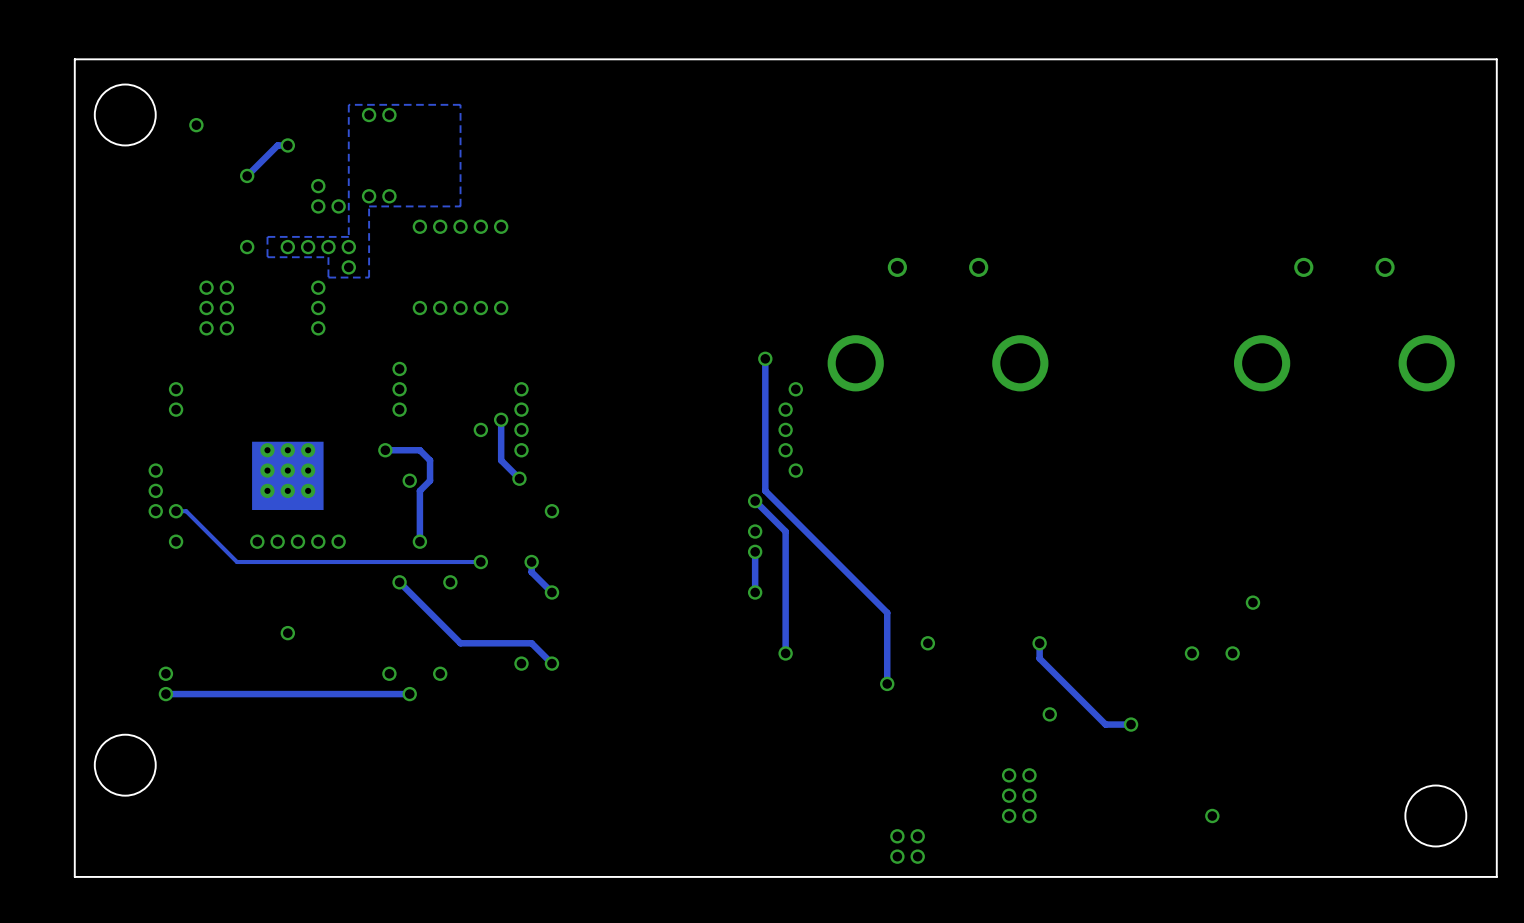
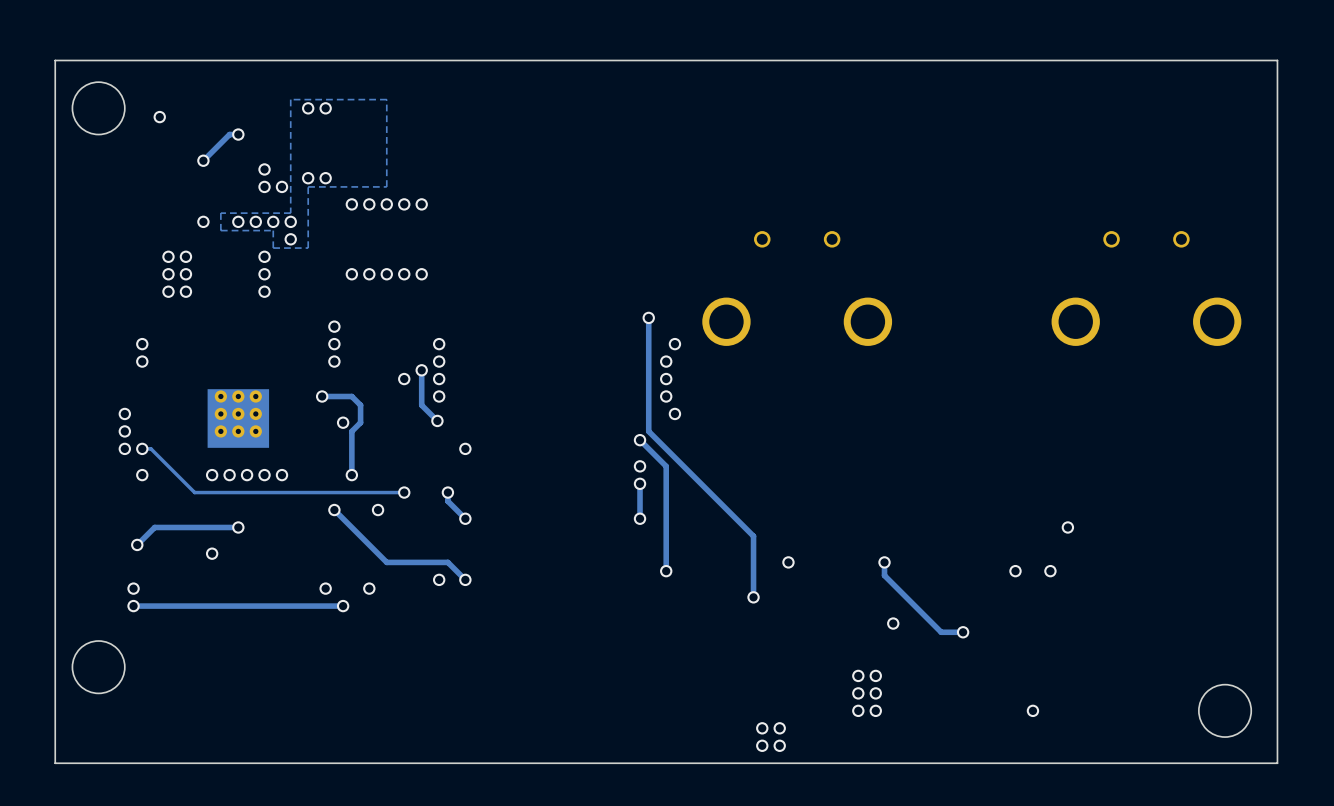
track: none -> (238, 527) (154, 527) (137, 544)
via: none -> (238, 527)
via: none -> (137, 544)
via: none -> (212, 553)
via: (287, 633) -> none

